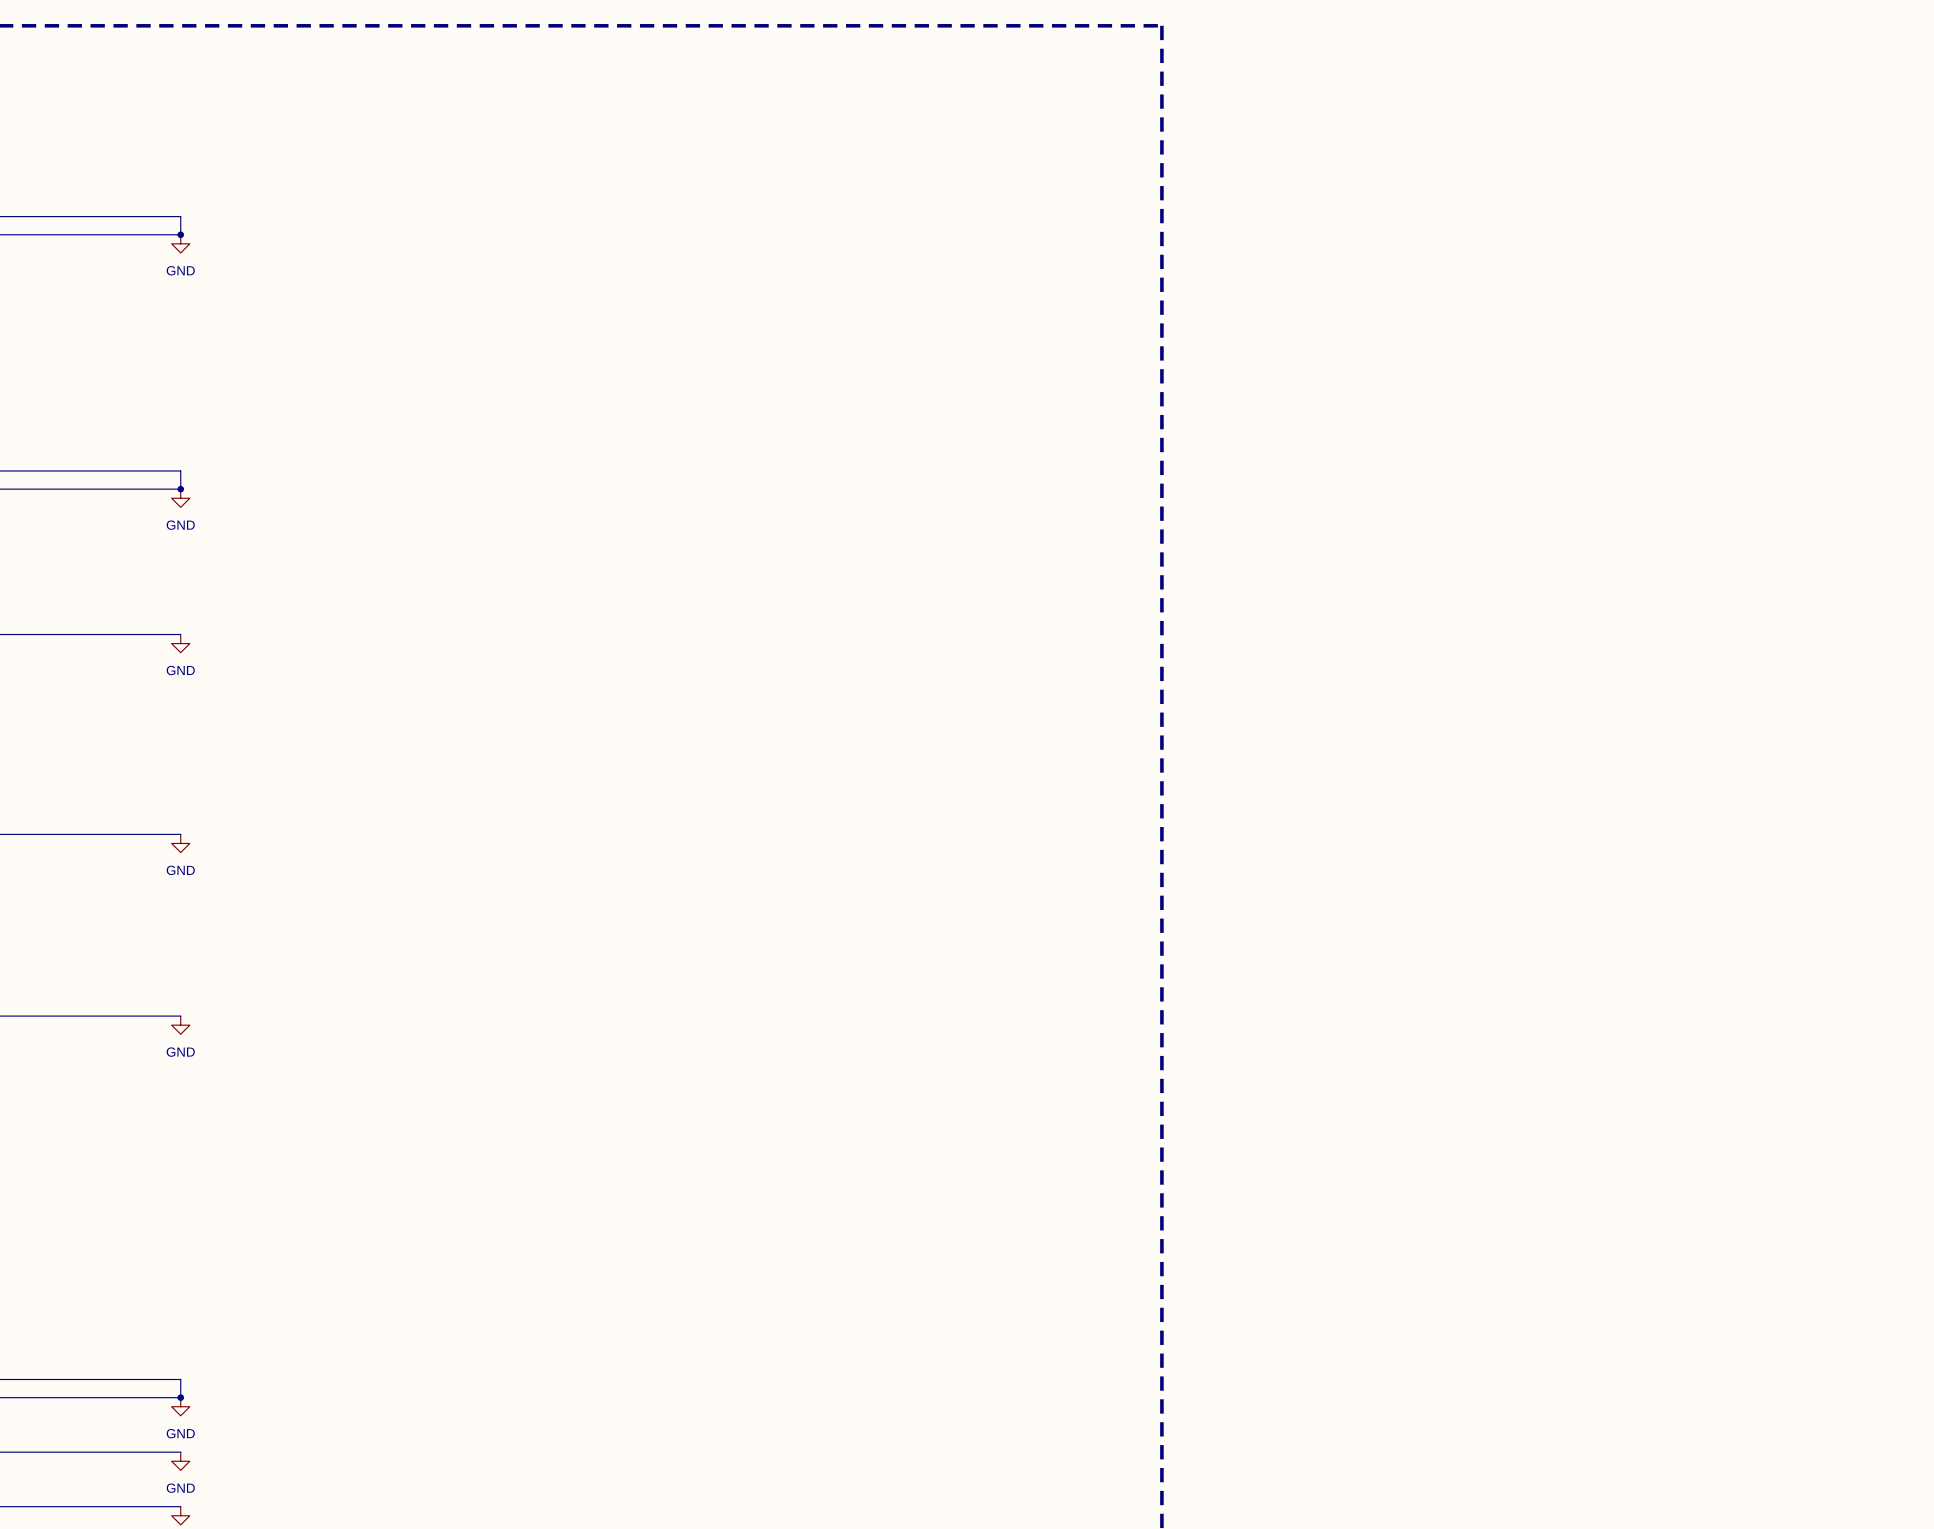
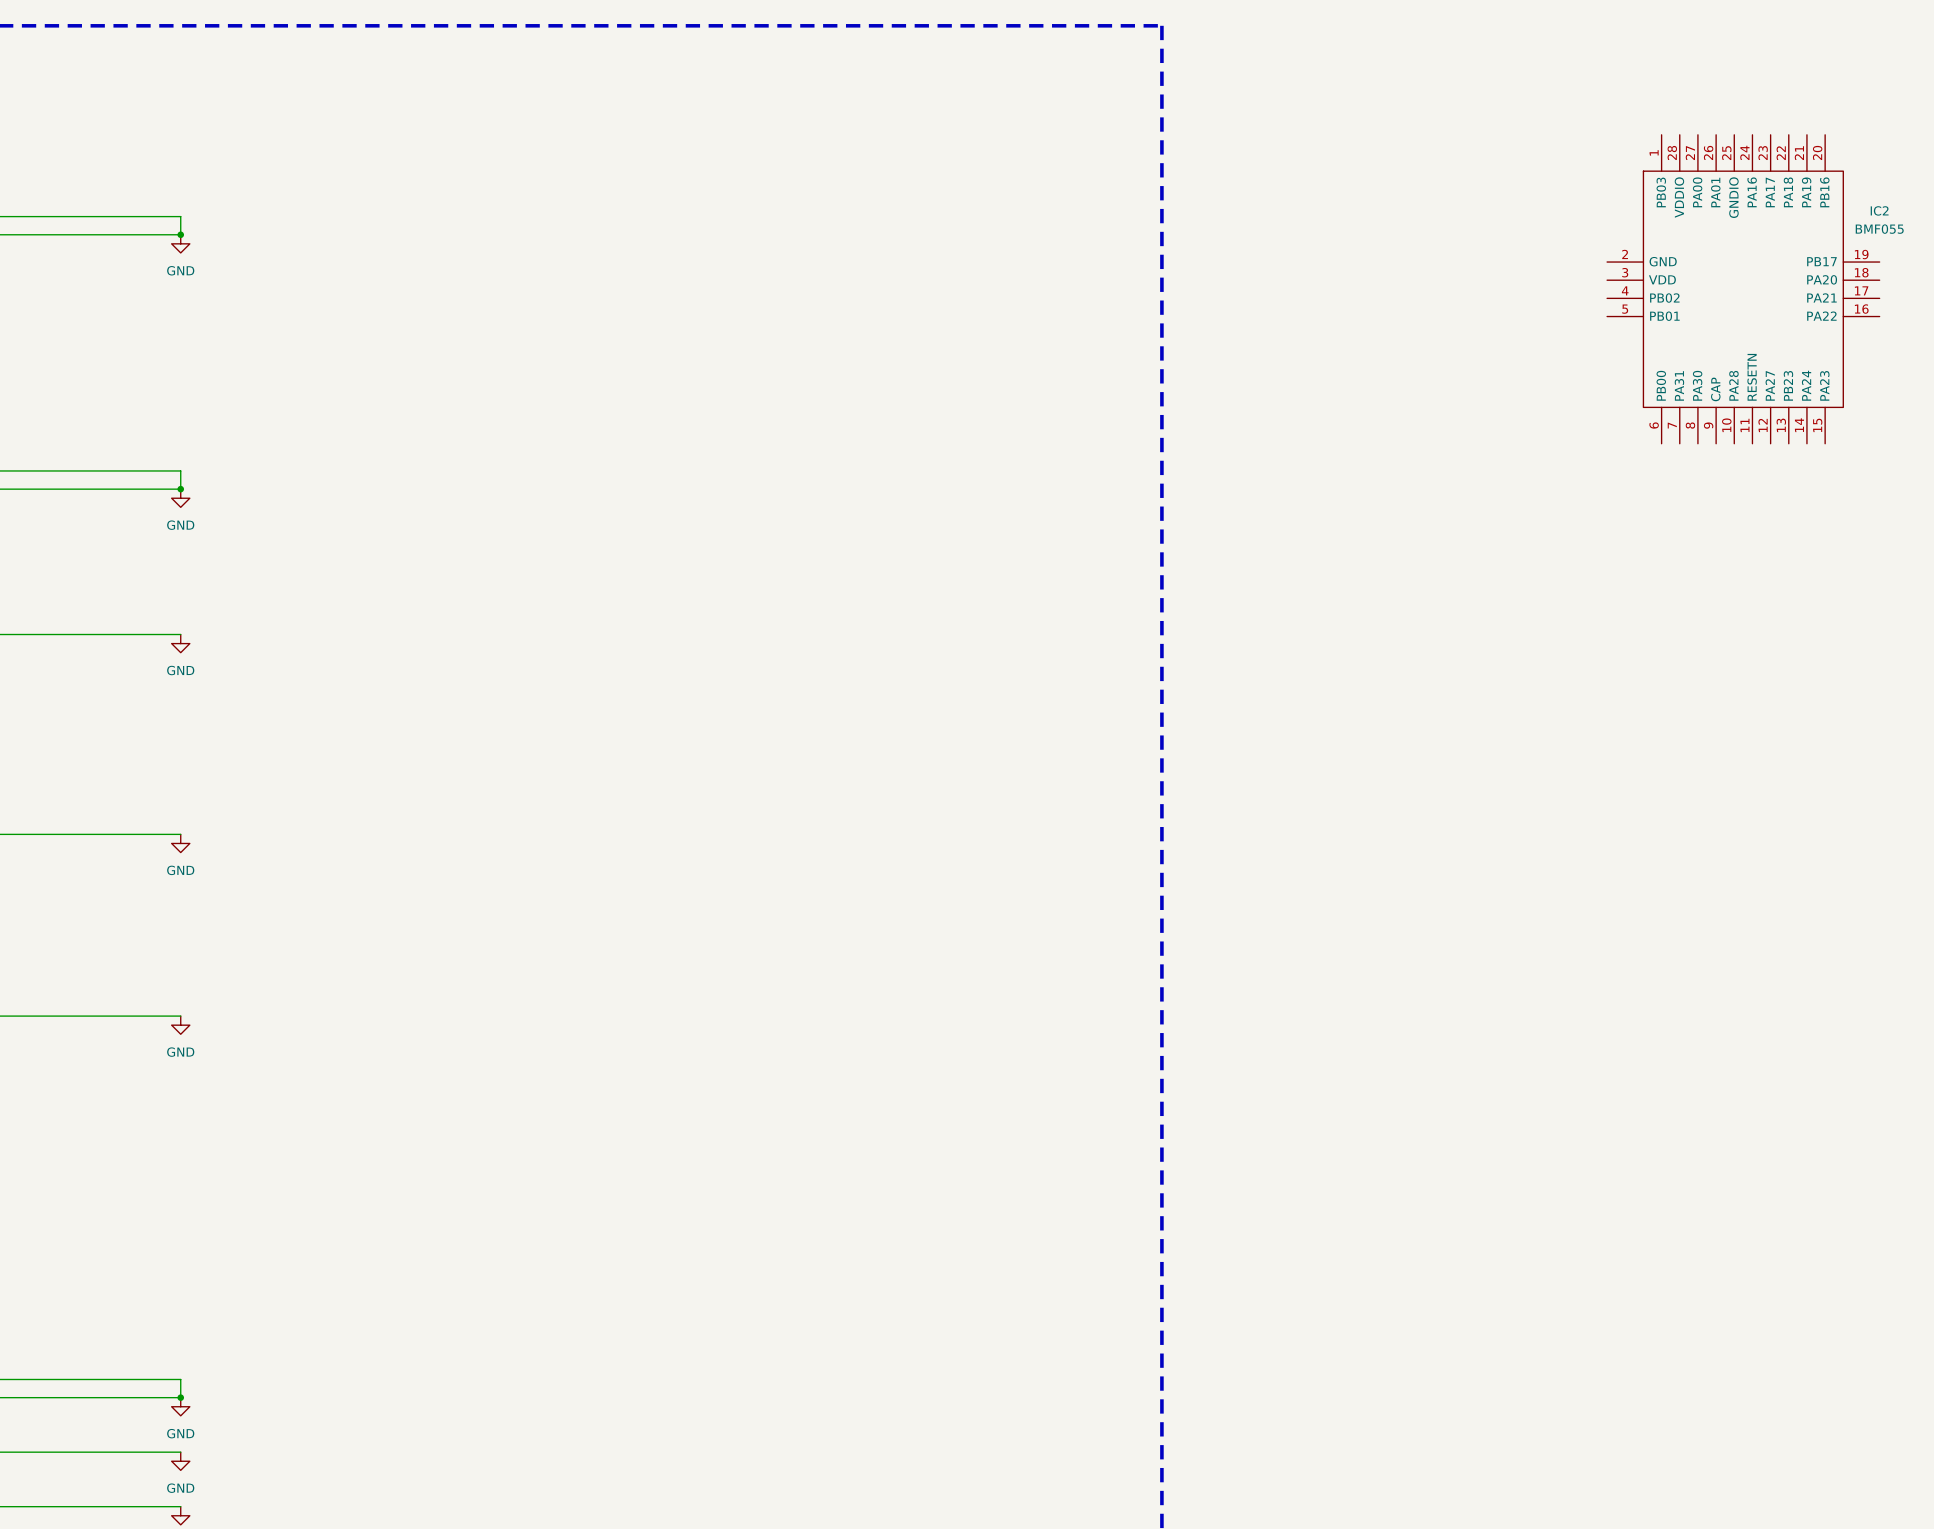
IC2: none -> BMF055 (1743, 289)

